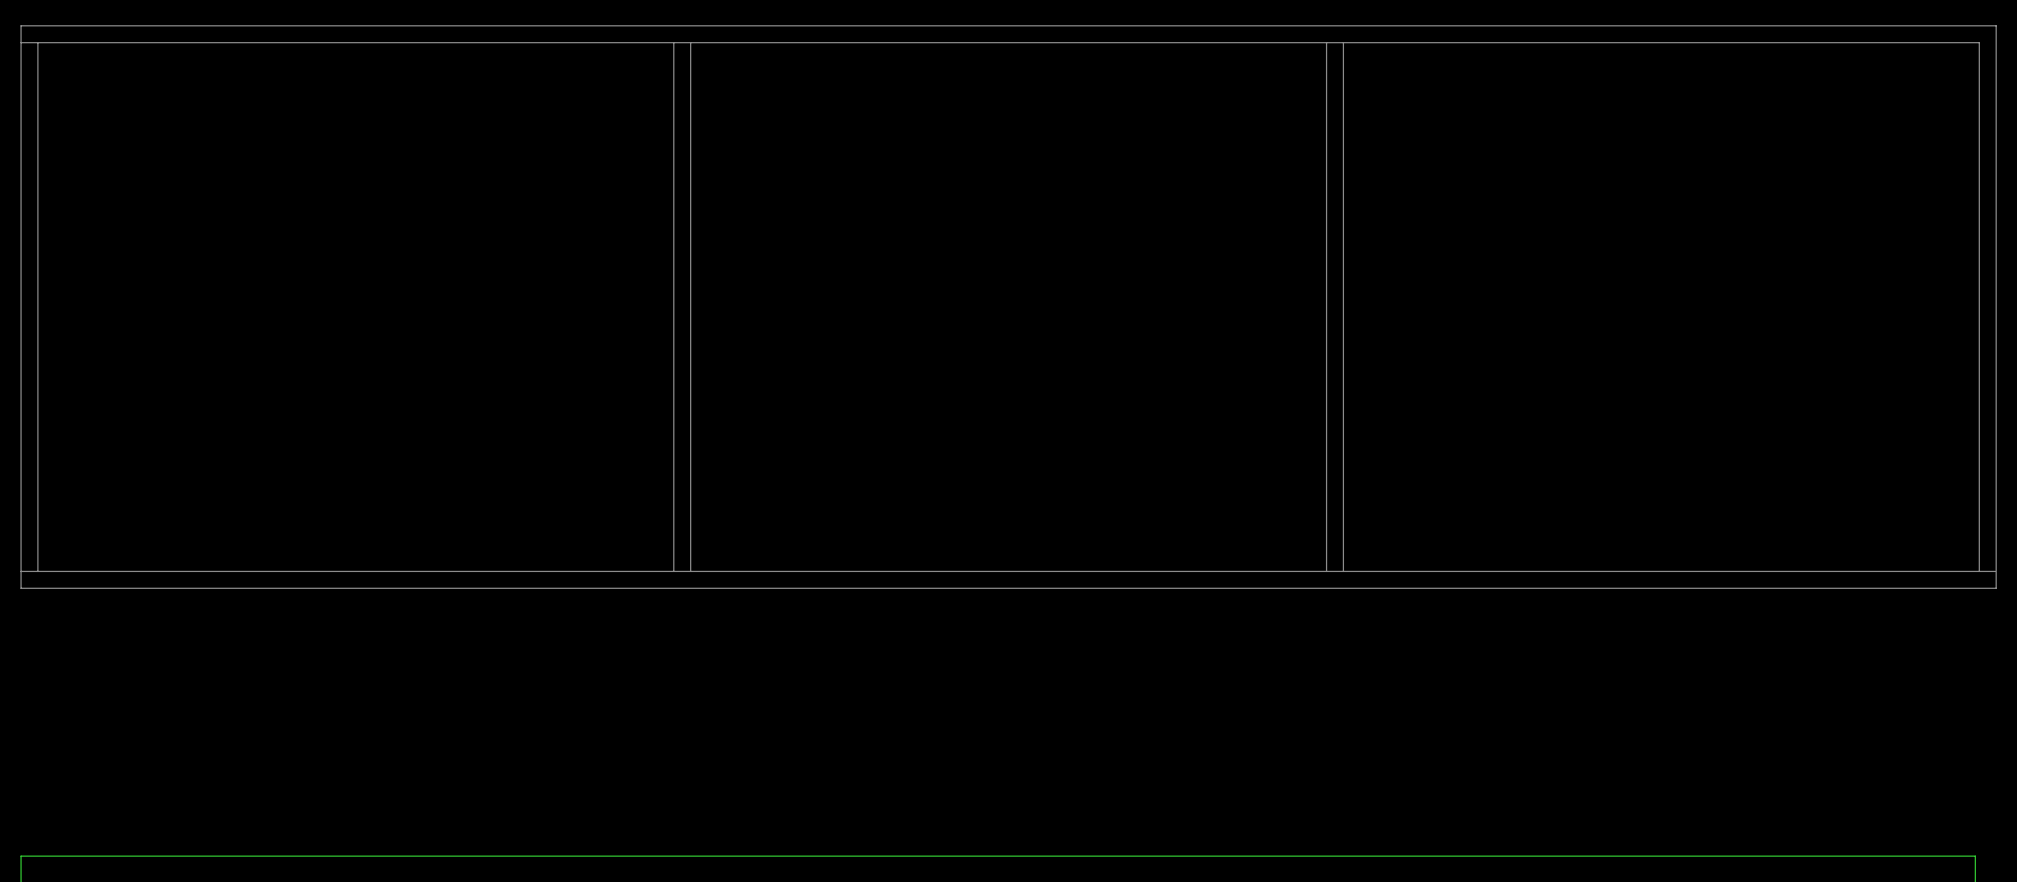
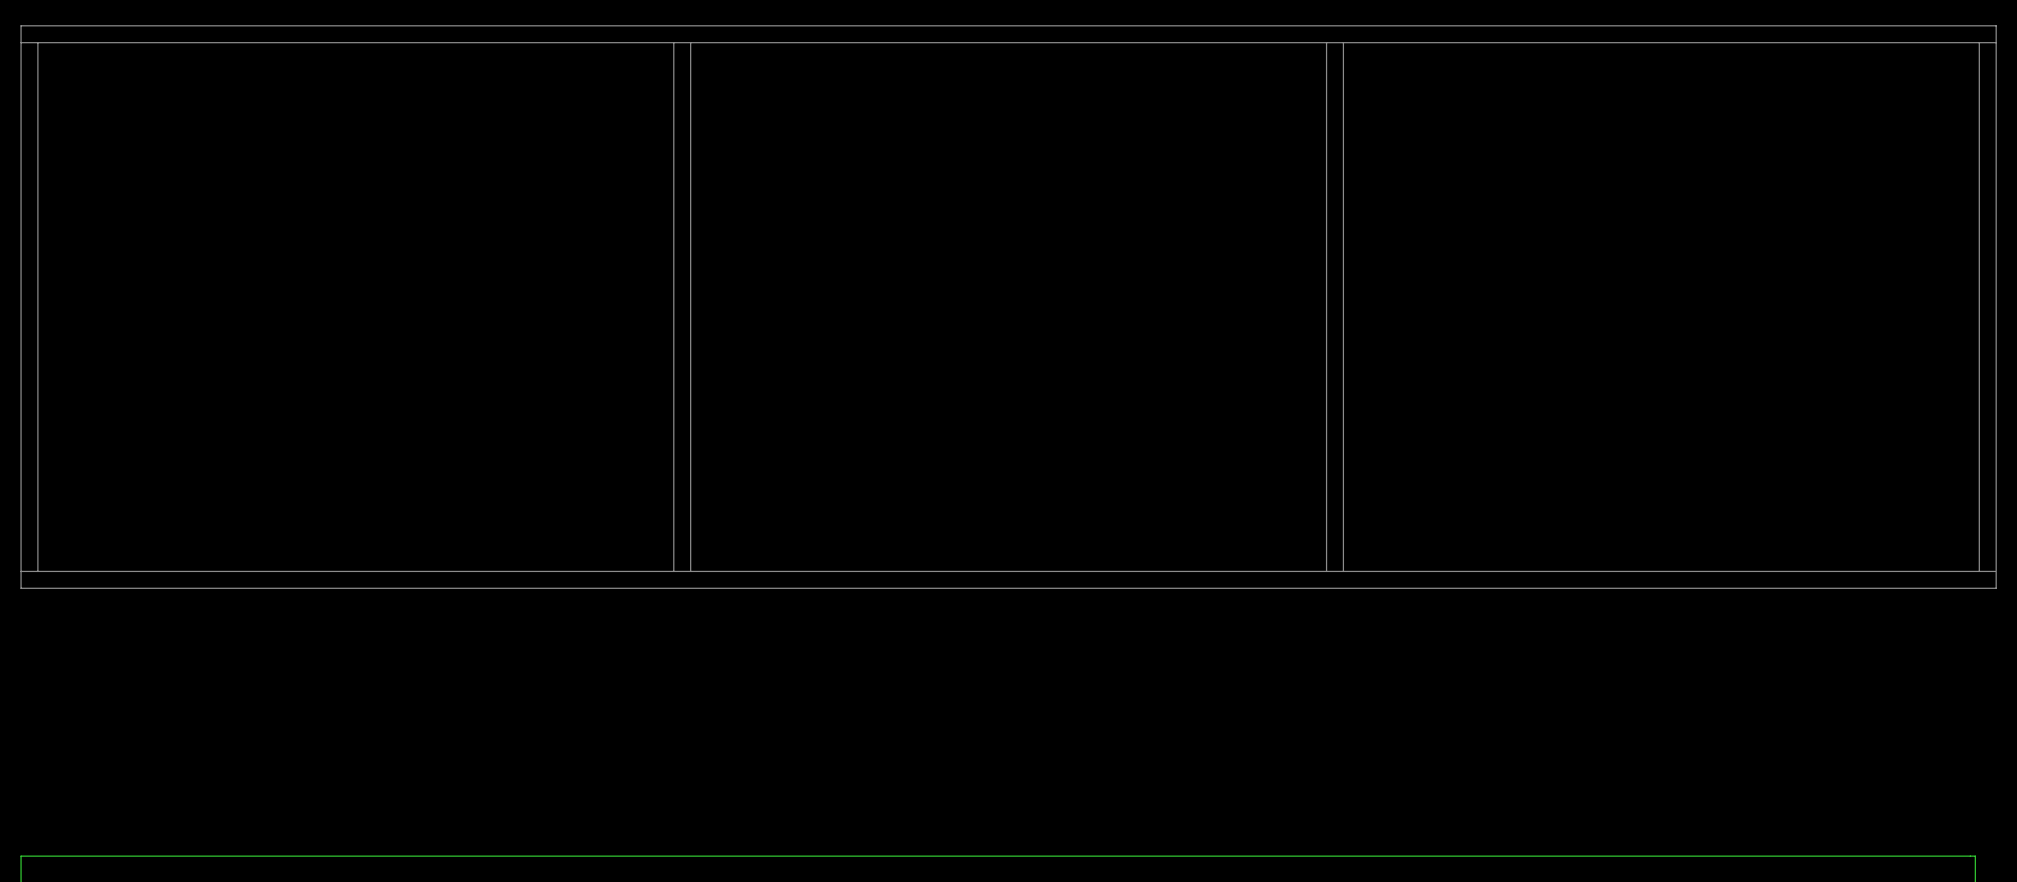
bus: none -> (1979, 42) (1996, 42)

